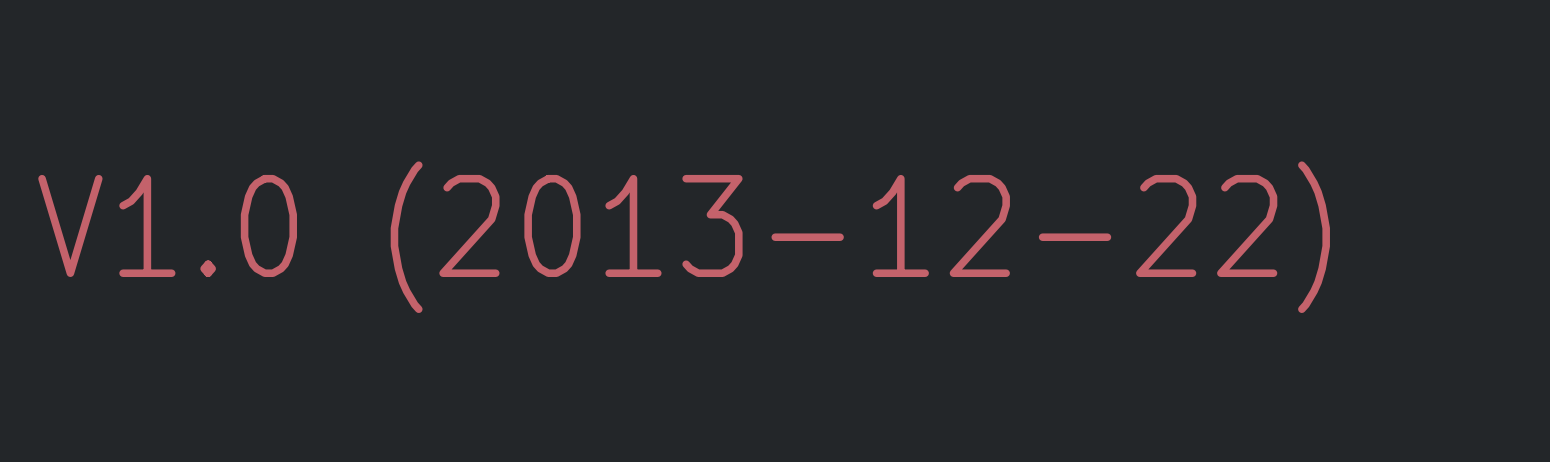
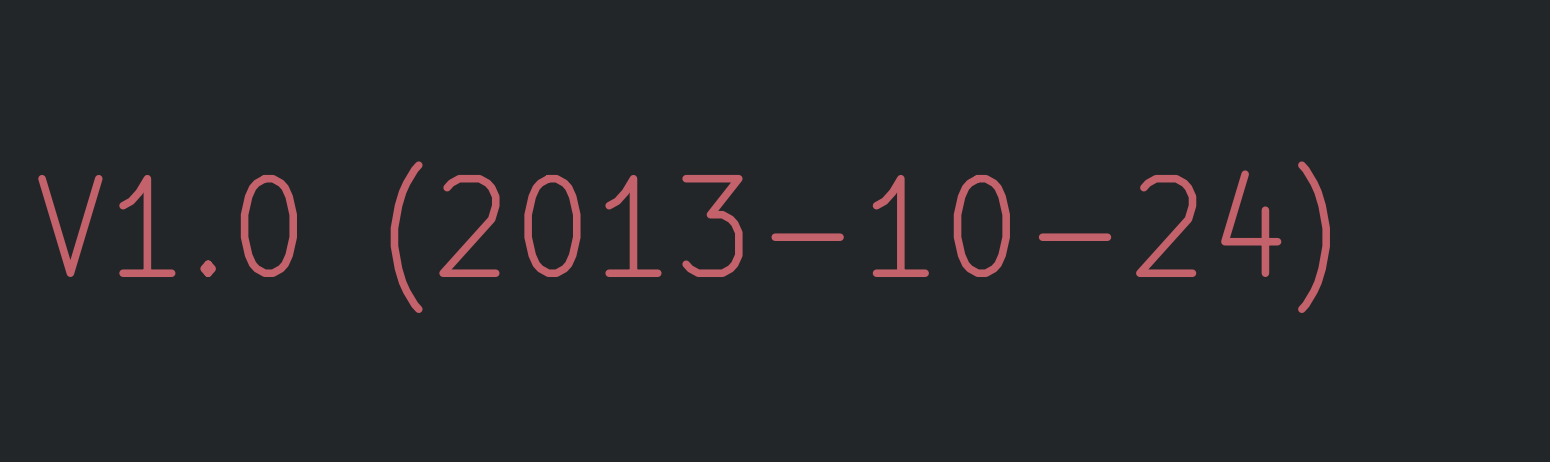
text: V1.0 (2013-12-22) (684, 237) -> V1.0 (2013-10-24) (684, 237)

